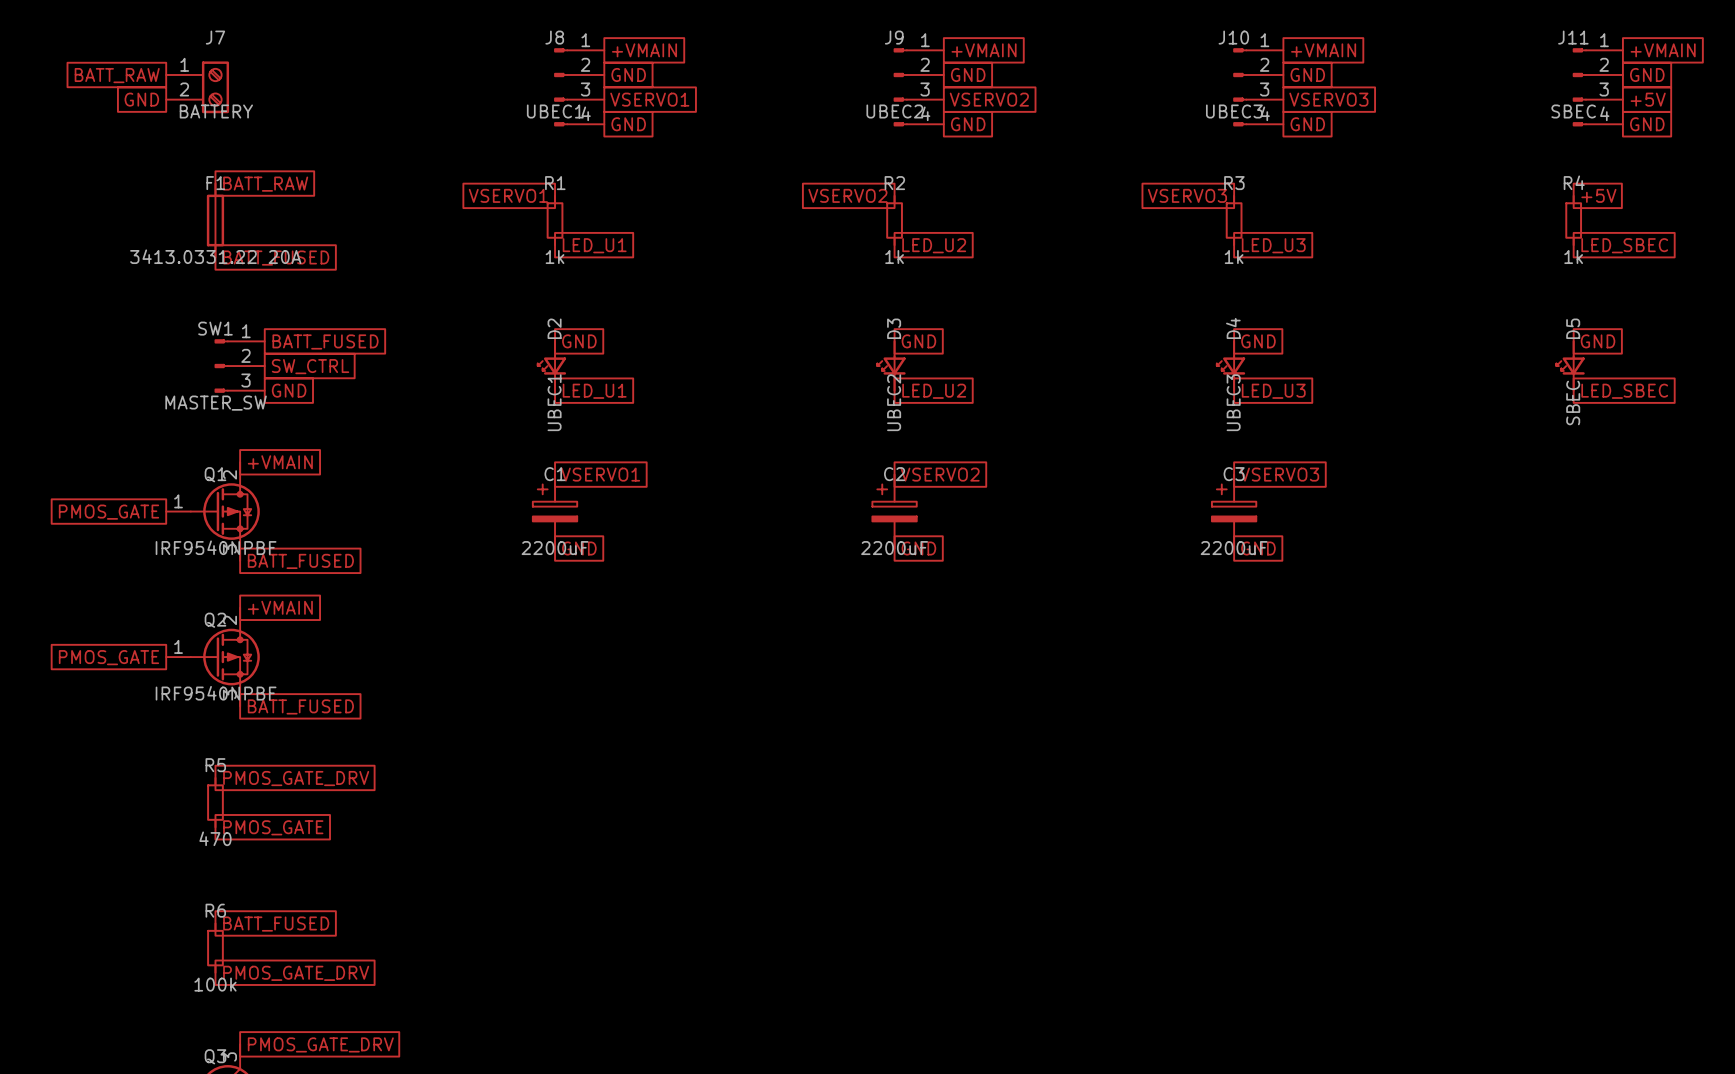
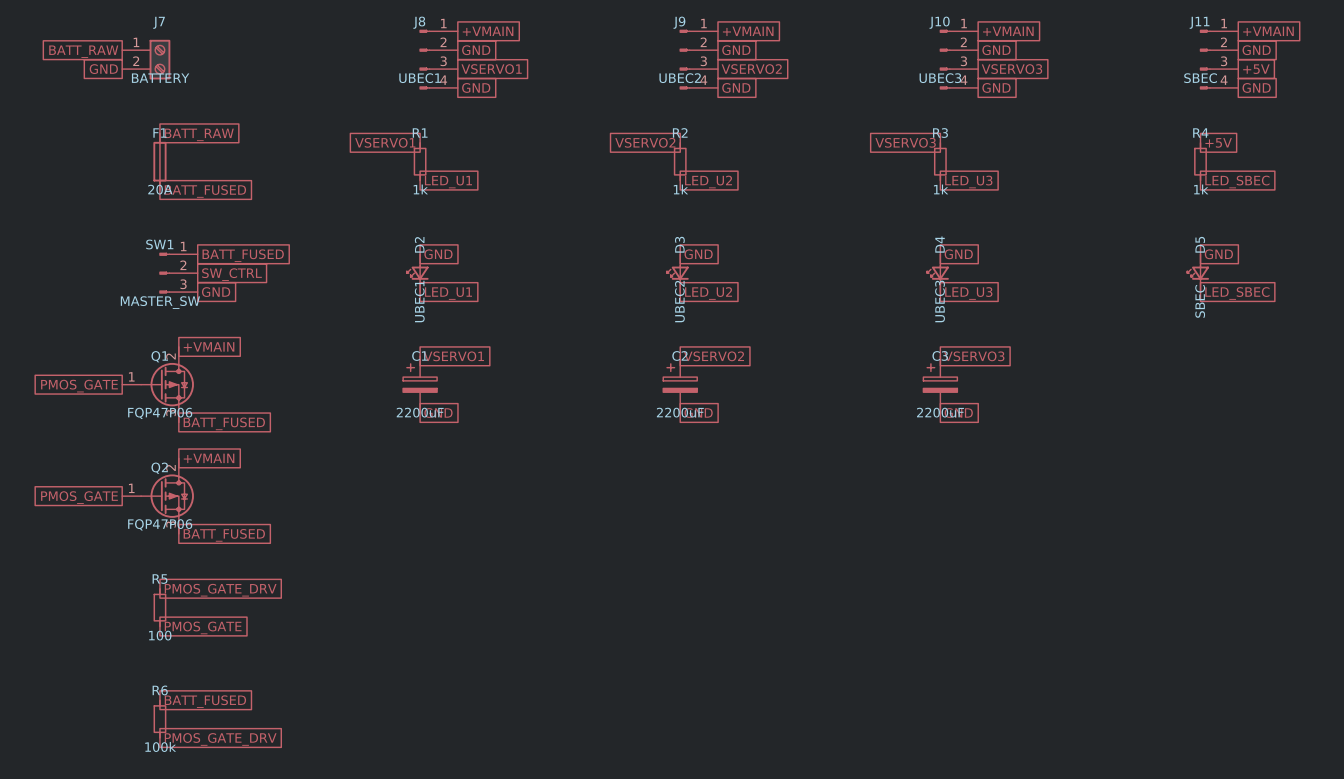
F1 value: 3413.0331.22 20A (215, 256) -> 20A (160, 189)
Q1 value: IRF9540NPBF (216, 547) -> FQP47P06 (160, 413)
Q2 value: IRF9540NPBF (216, 693) -> FQP47P06 (160, 524)
R5 value: 470 (215, 838) -> 100 (160, 635)

